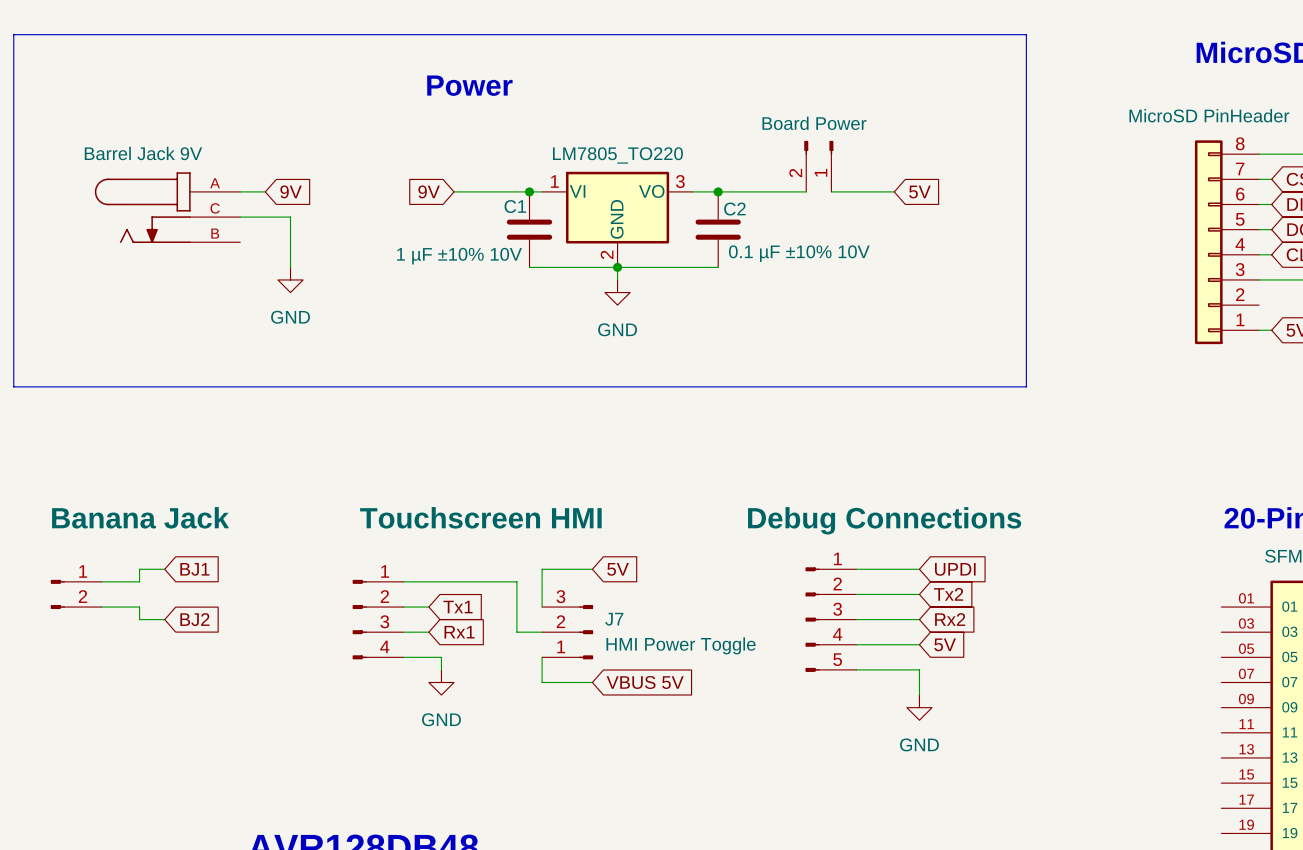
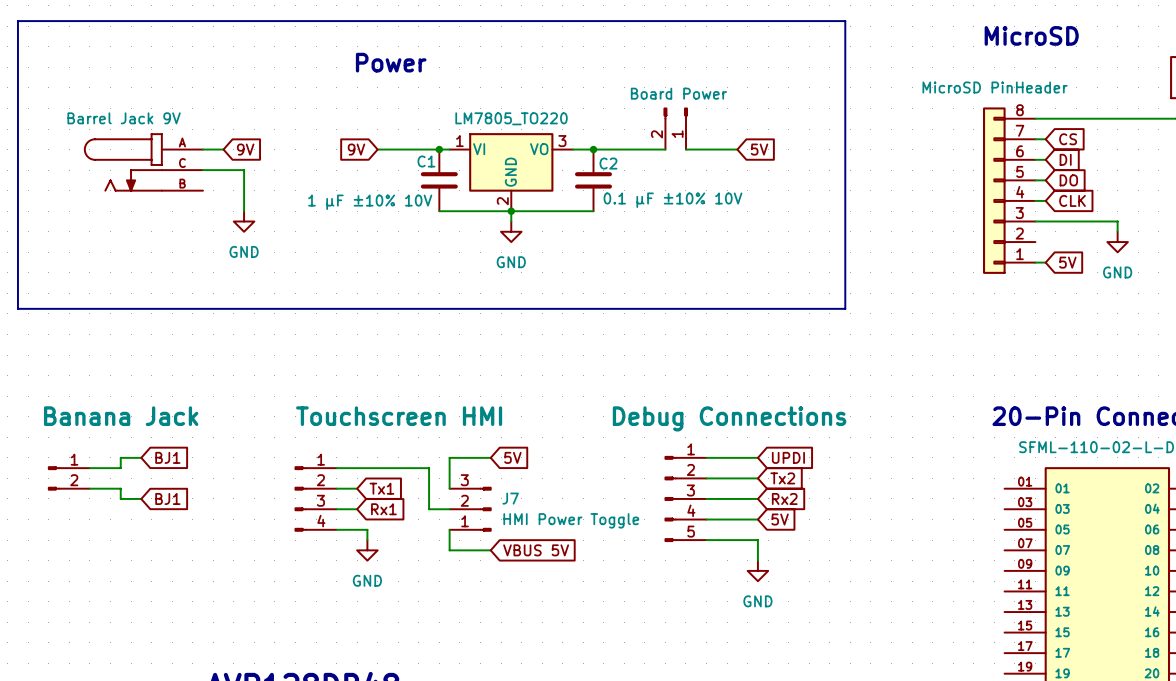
global label: BJ2 (194, 619) -> BJ1 (167, 498)

